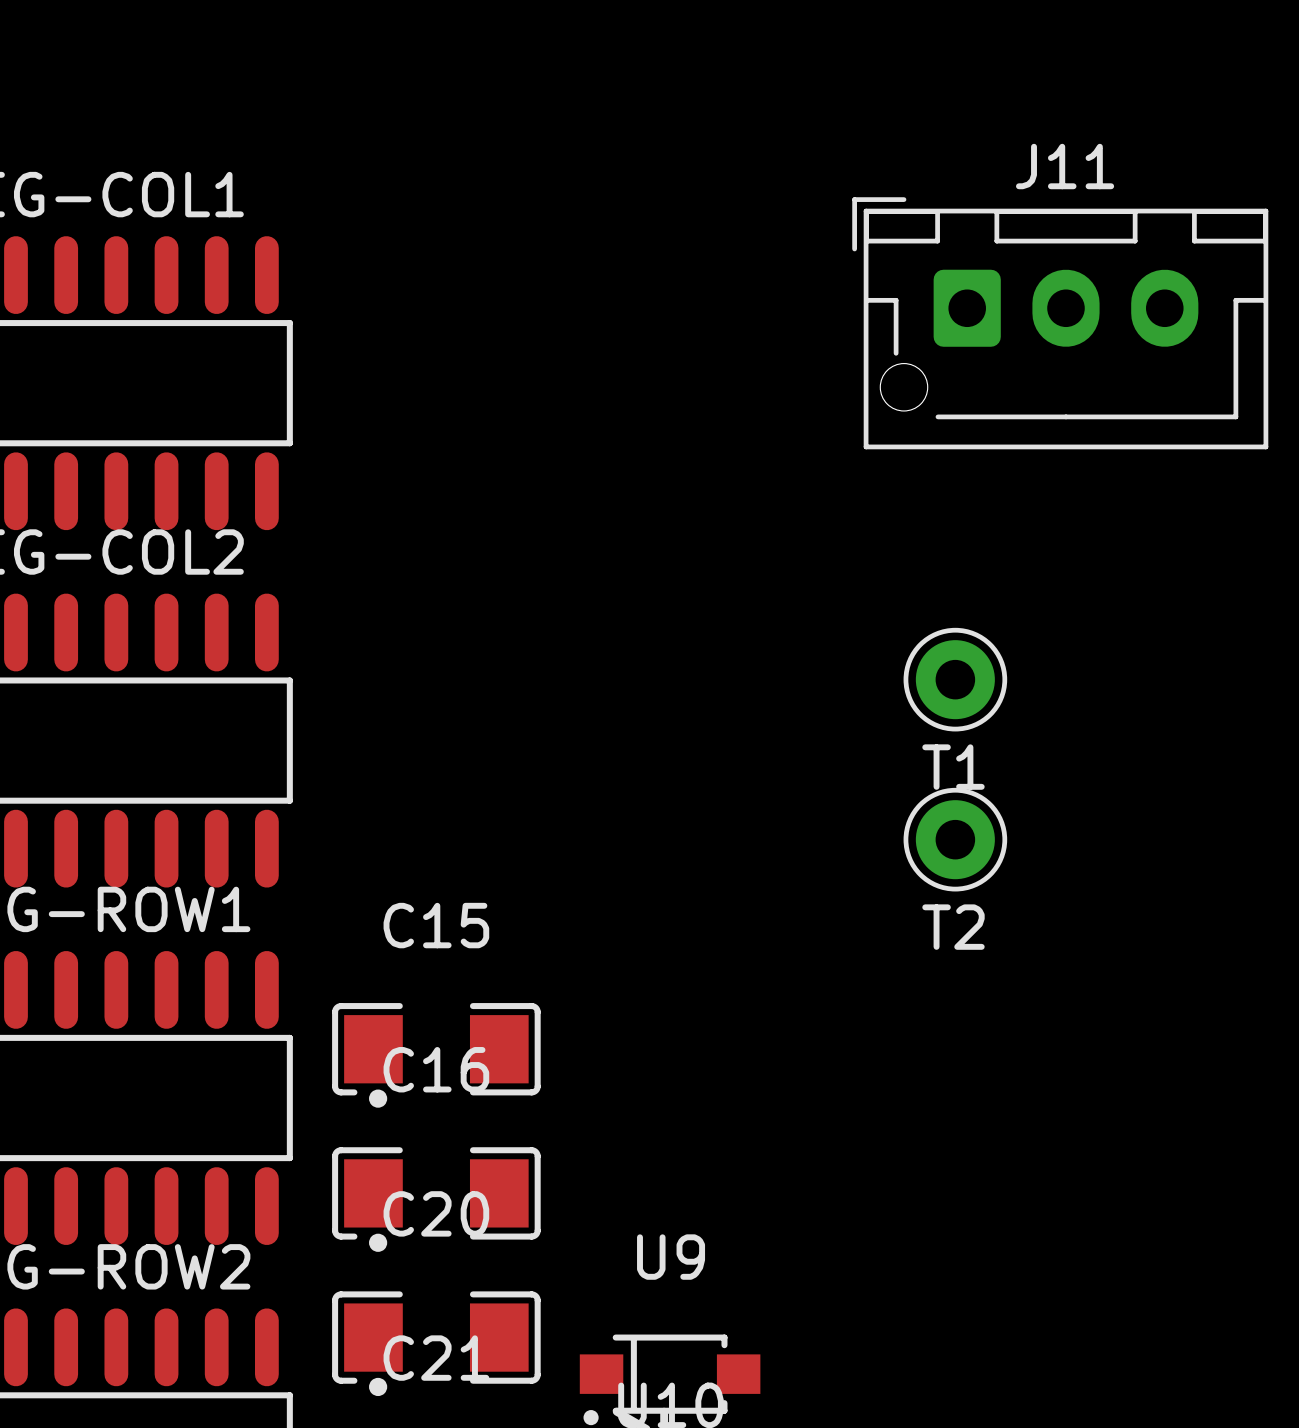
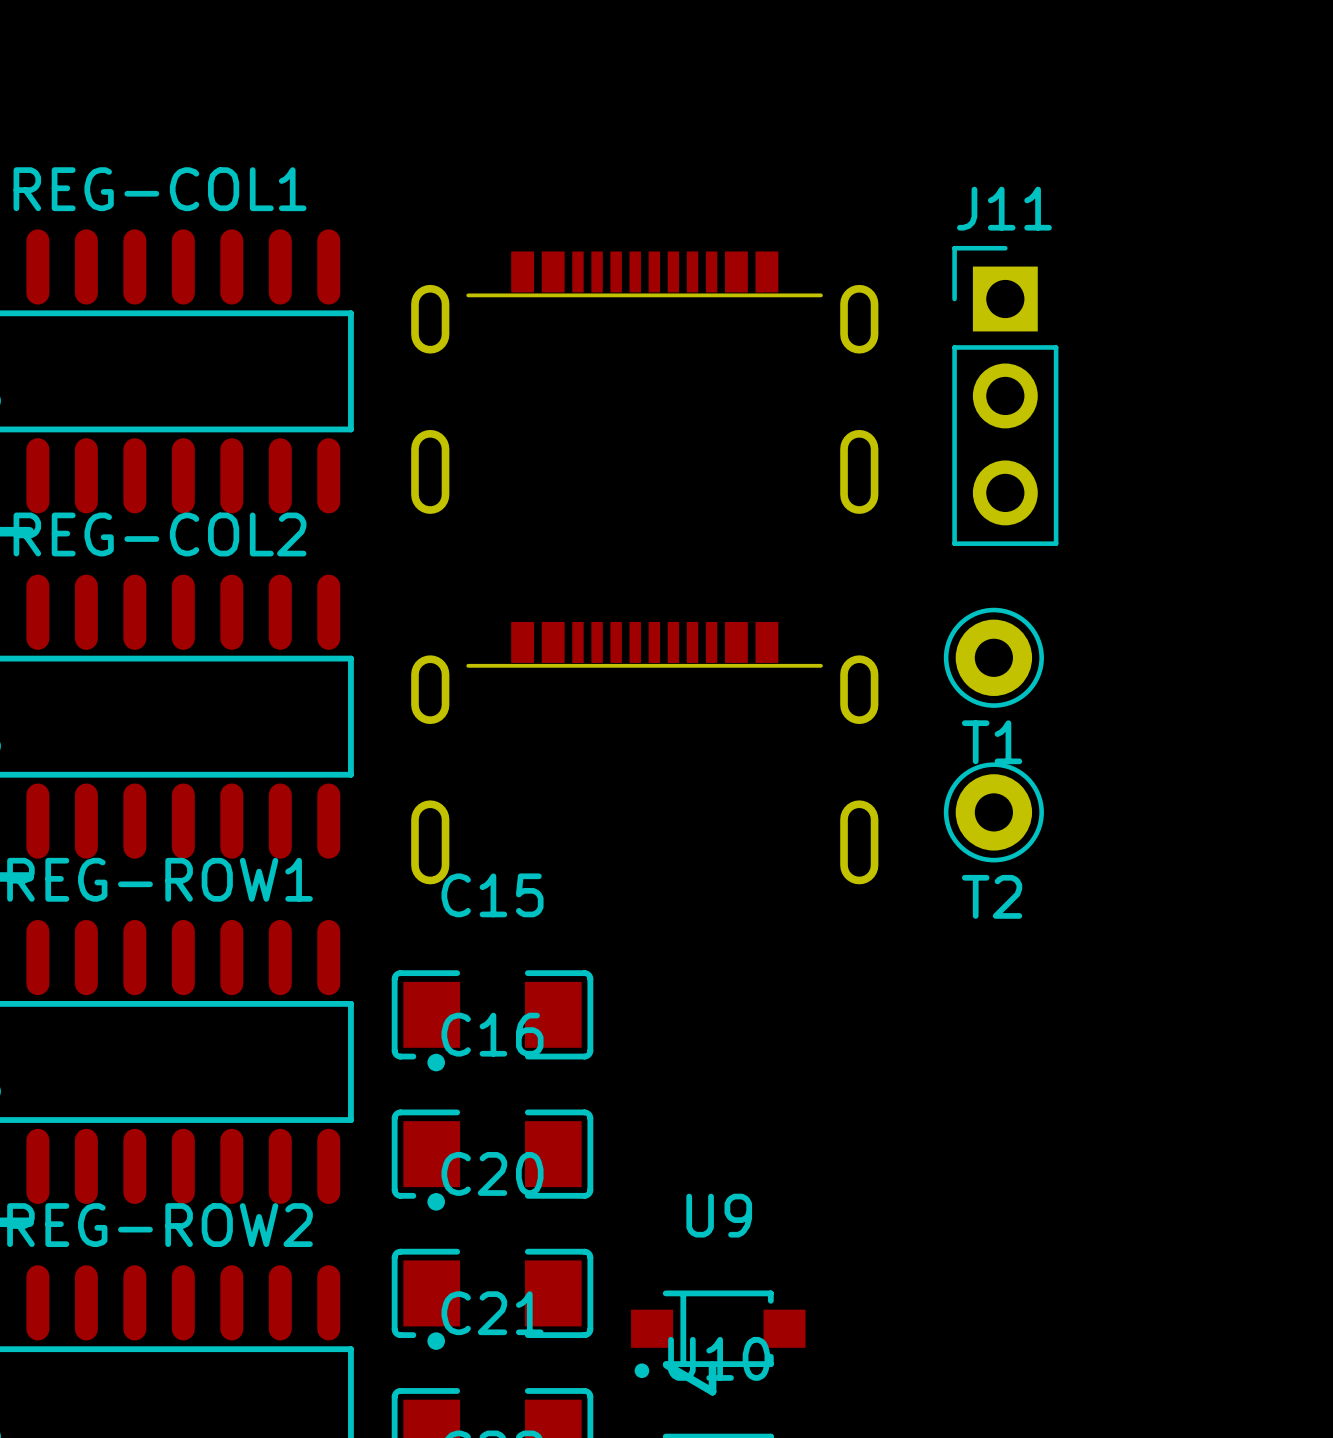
J11 footprint: [852, 197, 1269, 450] -> [952, 245, 1059, 546]
part: none -> (644, 382)
part: none -> (644, 753)

